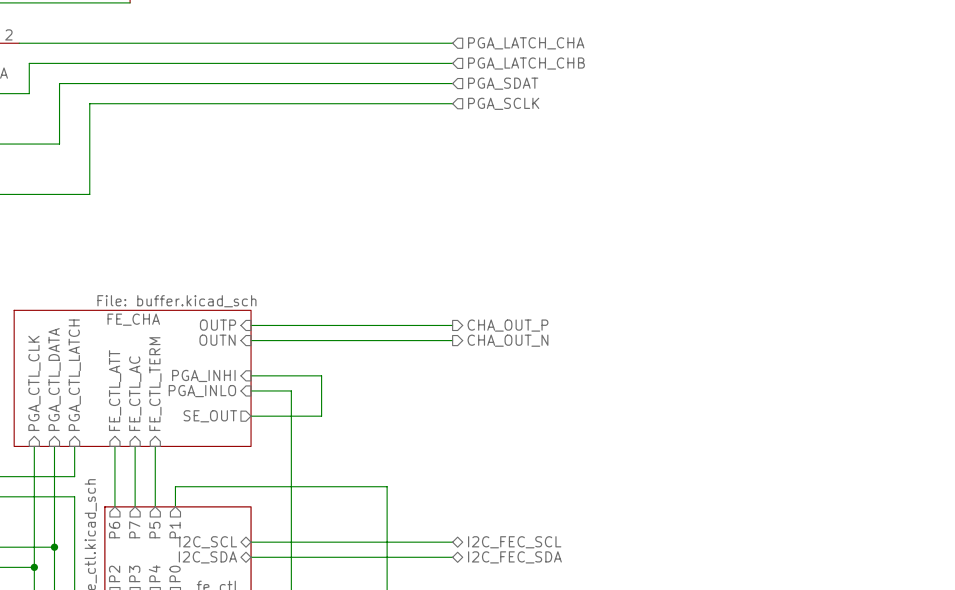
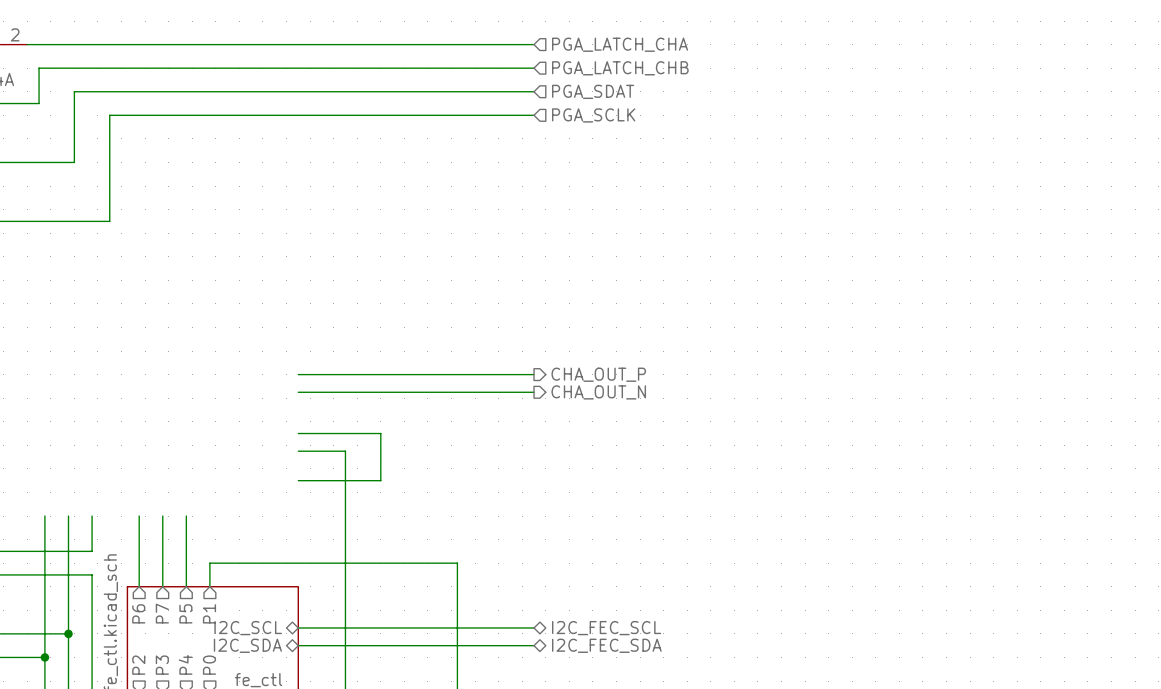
sheet pin: OUTP (218, 325) -> none
sheet pin: OUTN (217, 340) -> none
sheet pin: PGA_CTL_LATCH (74, 375) -> none
sheet pin: PGA_INHI (203, 375) -> none
sheet FE_CHA: File: buffer.kicad_sch (132, 378) -> none
sheet pin: PGA_CTL_DATA (54, 379) -> none
sheet pin: PGA_CTL_CLK (34, 383) -> none
sheet pin: FE_CTL_TERM (155, 384) -> none
sheet pin: FE_CTL_ATT (115, 390) -> none
sheet pin: PGA_INLO (202, 391) -> none
sheet pin: FE_CTL_AC (135, 393) -> none
sheet pin: SE_OUT (210, 416) -> none

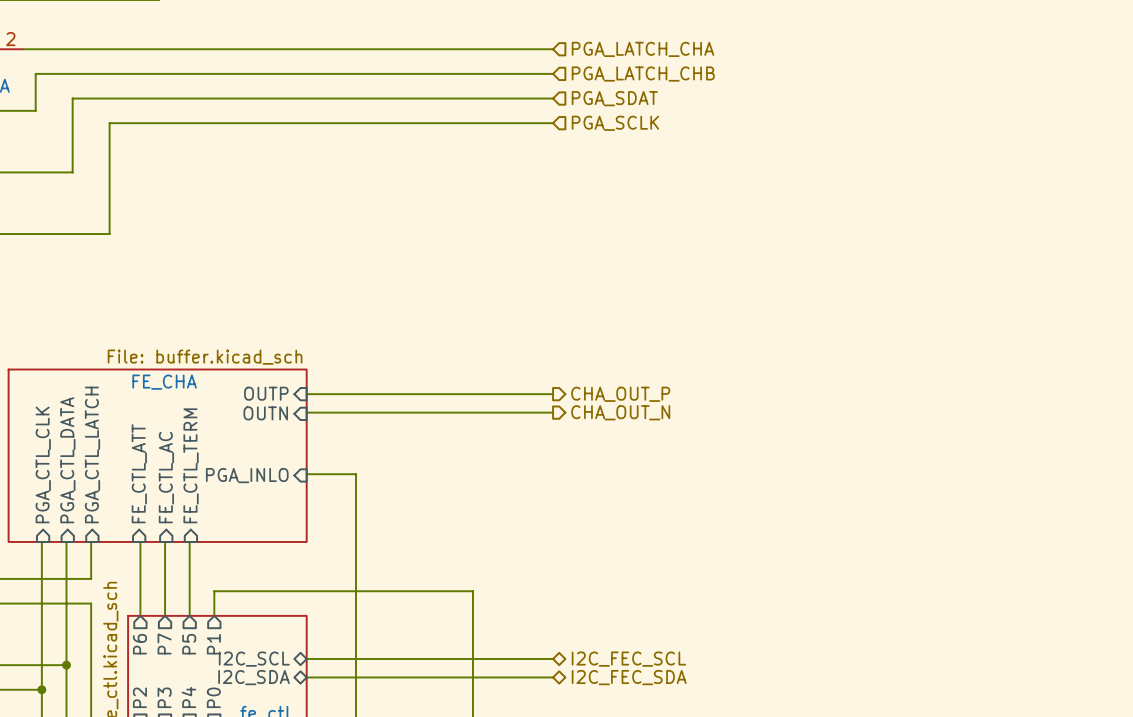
sheet pin: none -> OUTP (266, 393)
sheet pin: none -> OUTN (265, 413)
sheet pin: none -> PGA_CTL_LATCH (92, 454)
sheet FE_CHA: none -> File: buffer.kicad_sch (157, 455)
wire: (298, 433) (380, 433) (380, 480) (298, 480) -> none
sheet pin: none -> PGA_CTL_DATA (67, 460)
sheet pin: none -> PGA_CTL_CLK (43, 464)
sheet pin: none -> FE_CTL_TERM (191, 465)
sheet pin: none -> FE_CTL_ATT (139, 473)
sheet pin: none -> PGA_INLO (247, 475)
sheet pin: none -> FE_CTL_AC (166, 477)

